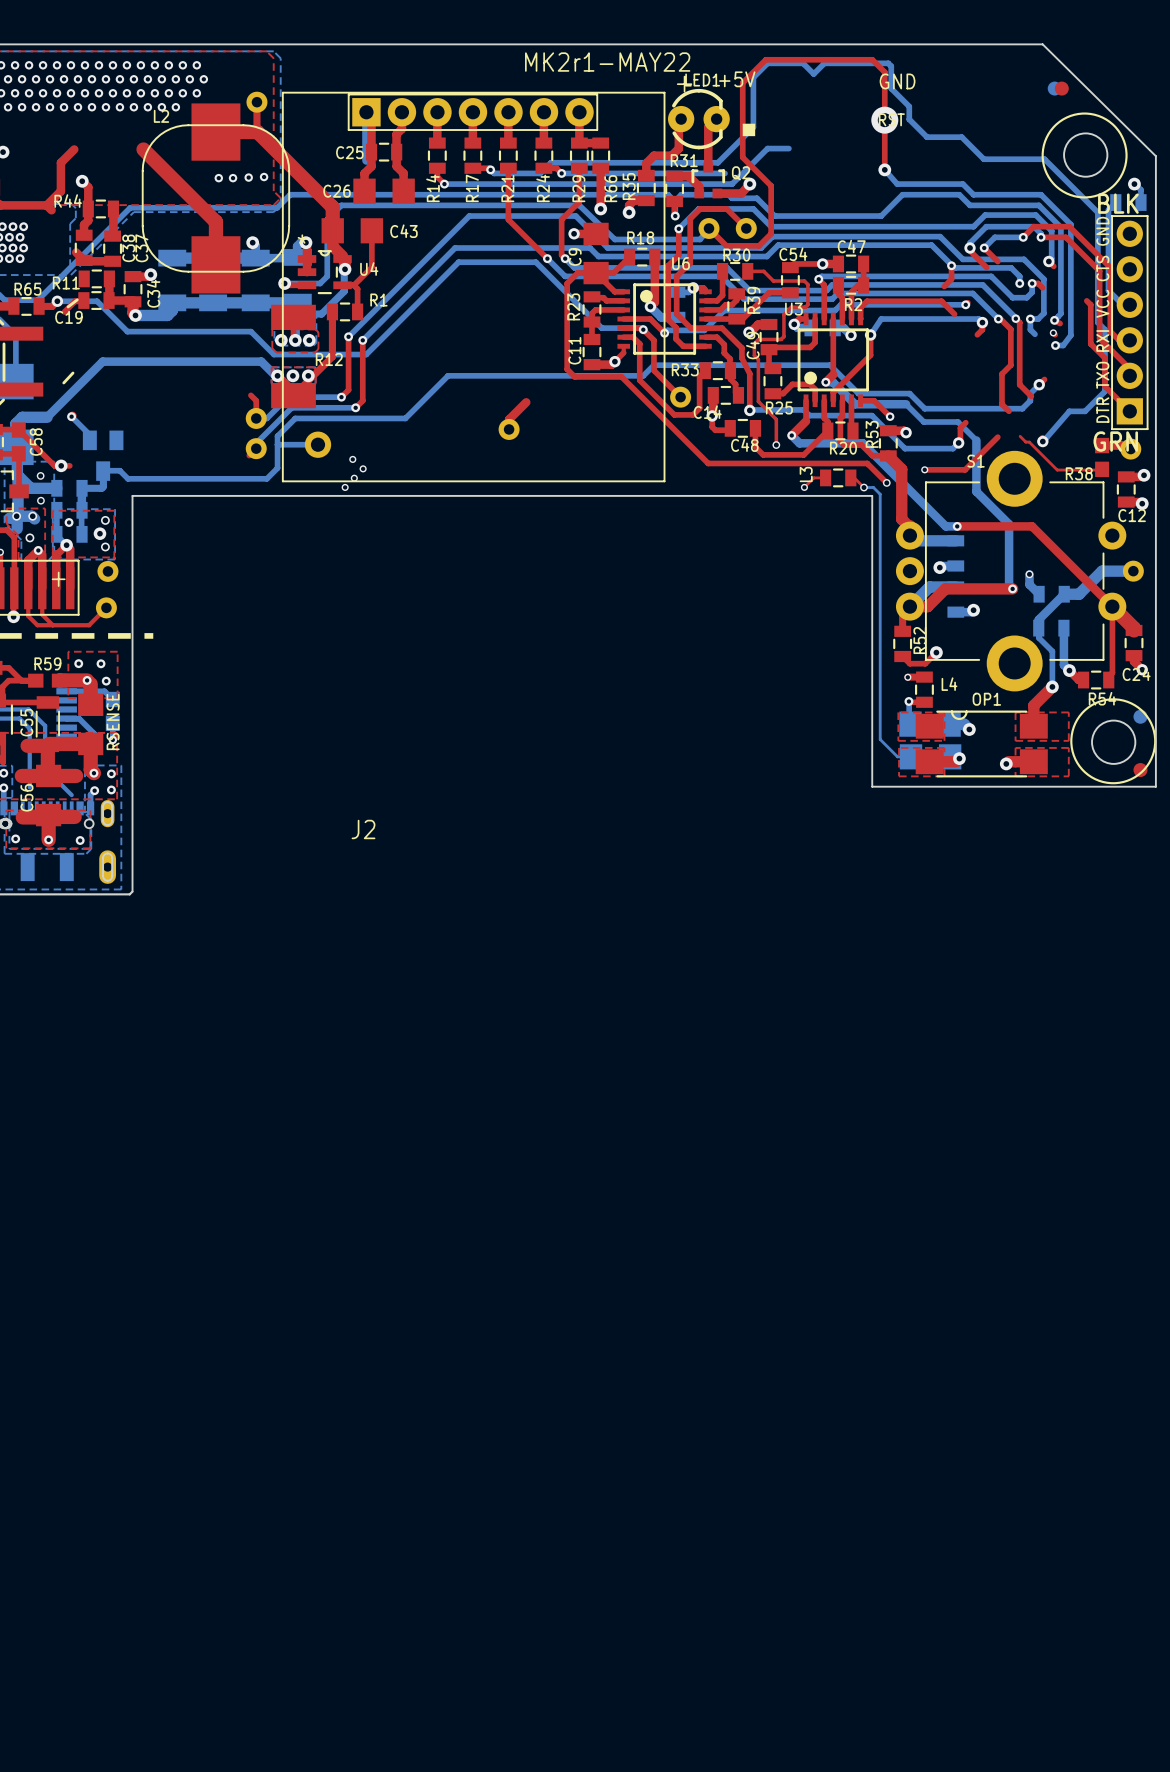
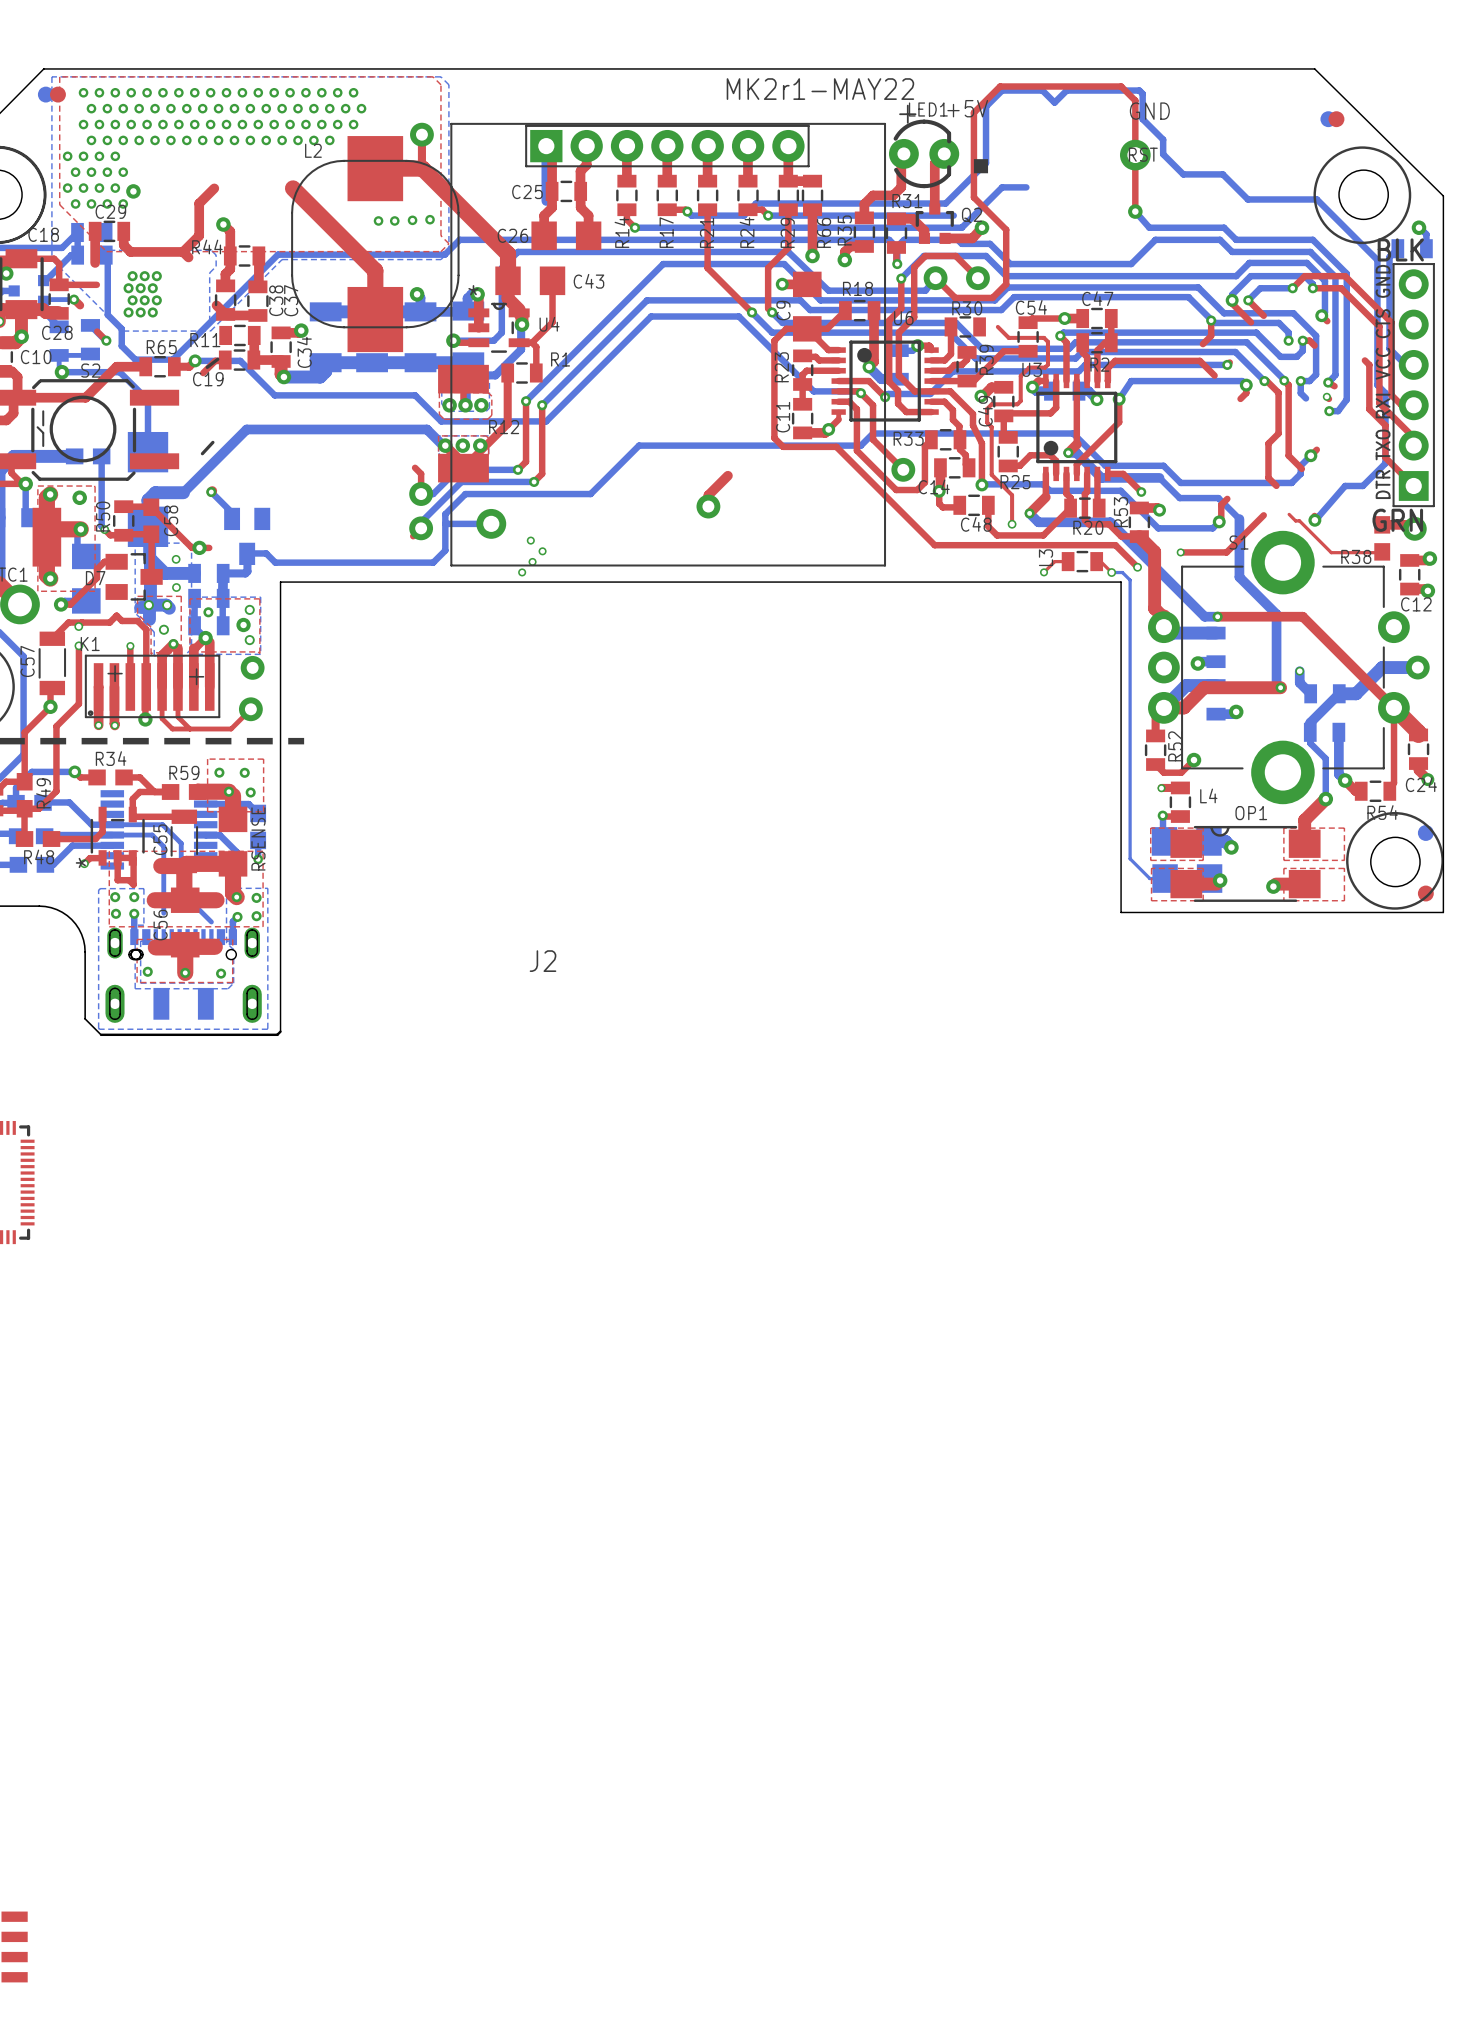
top track: (747, 271) (763, 271) -> none

